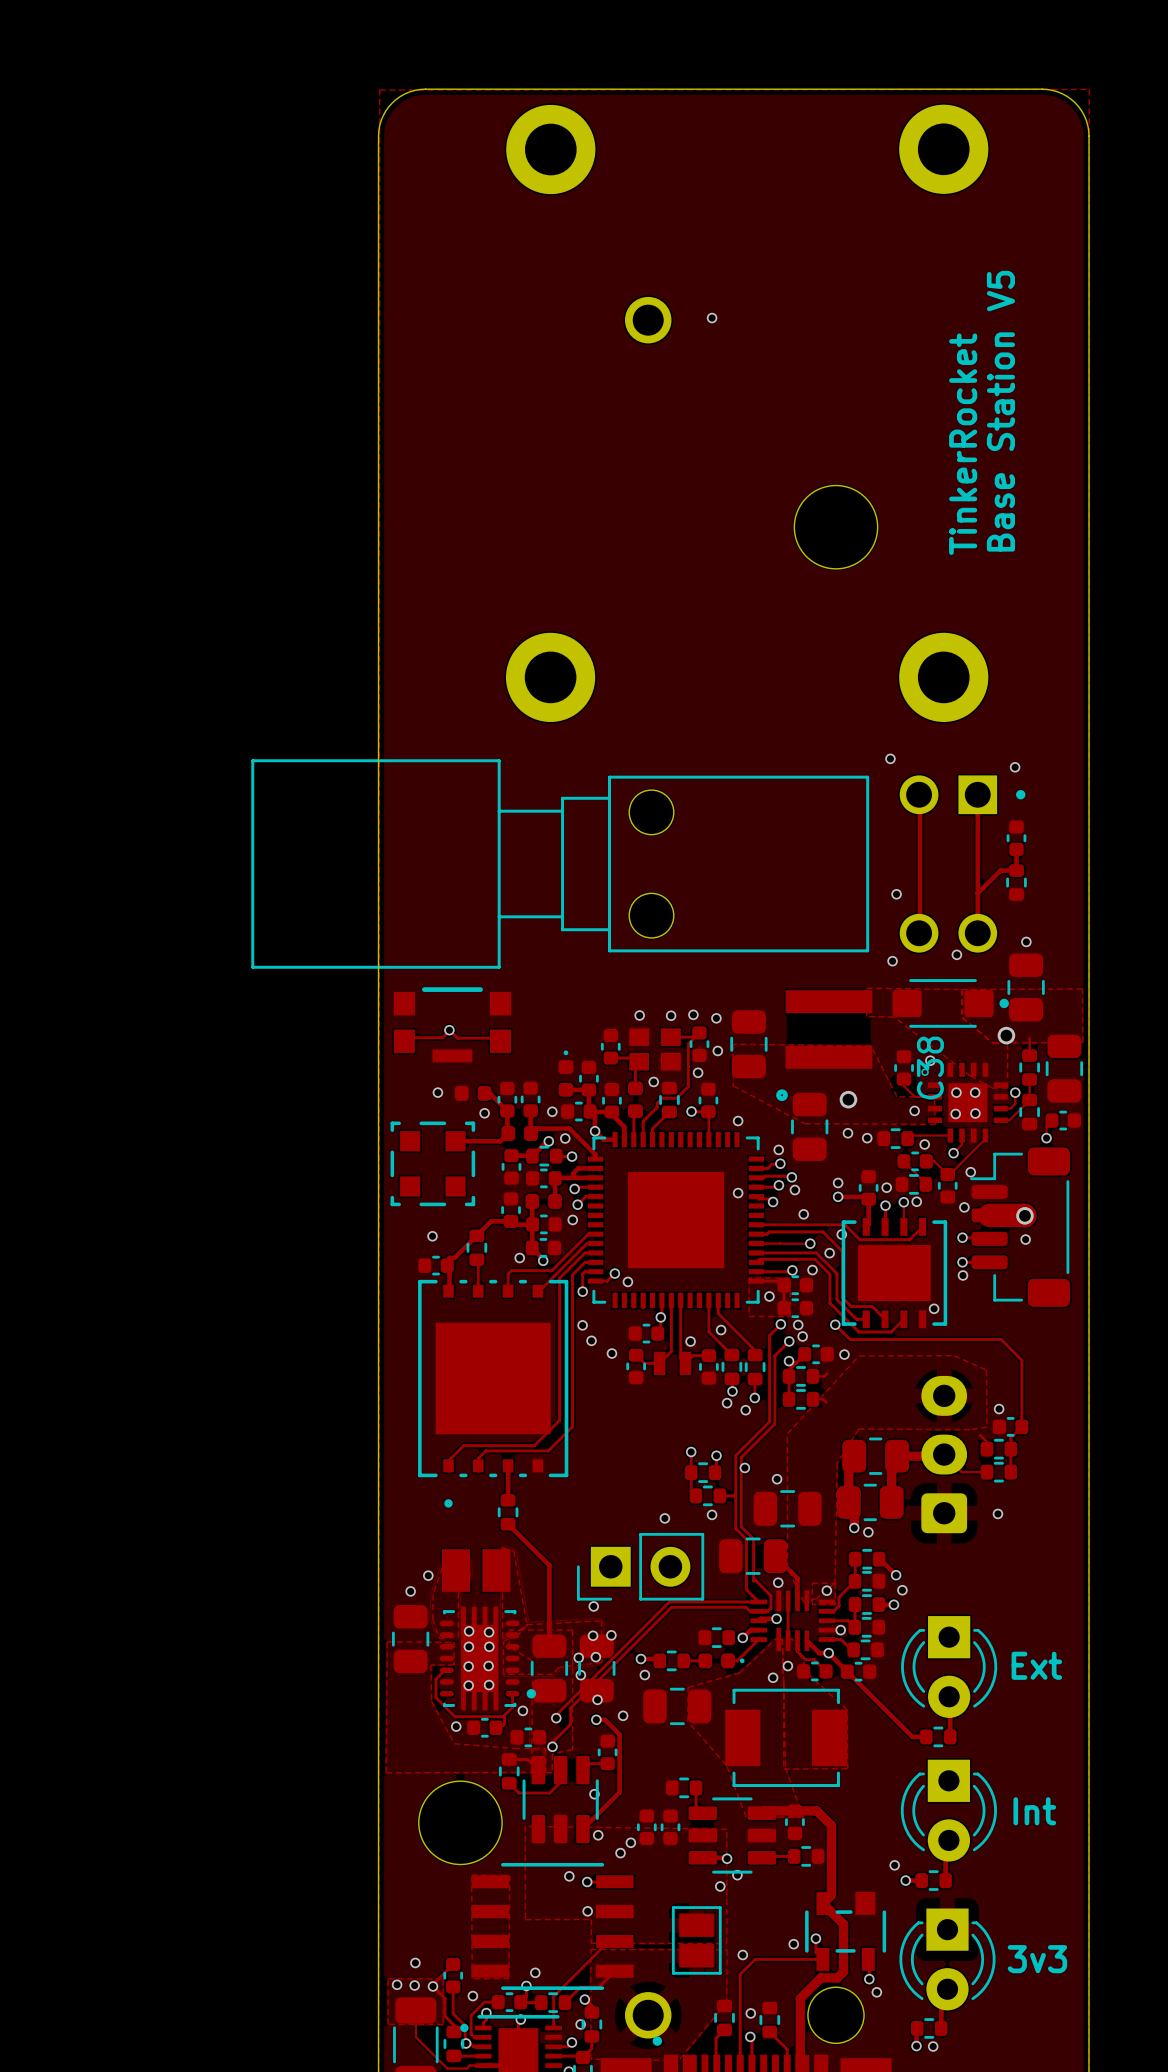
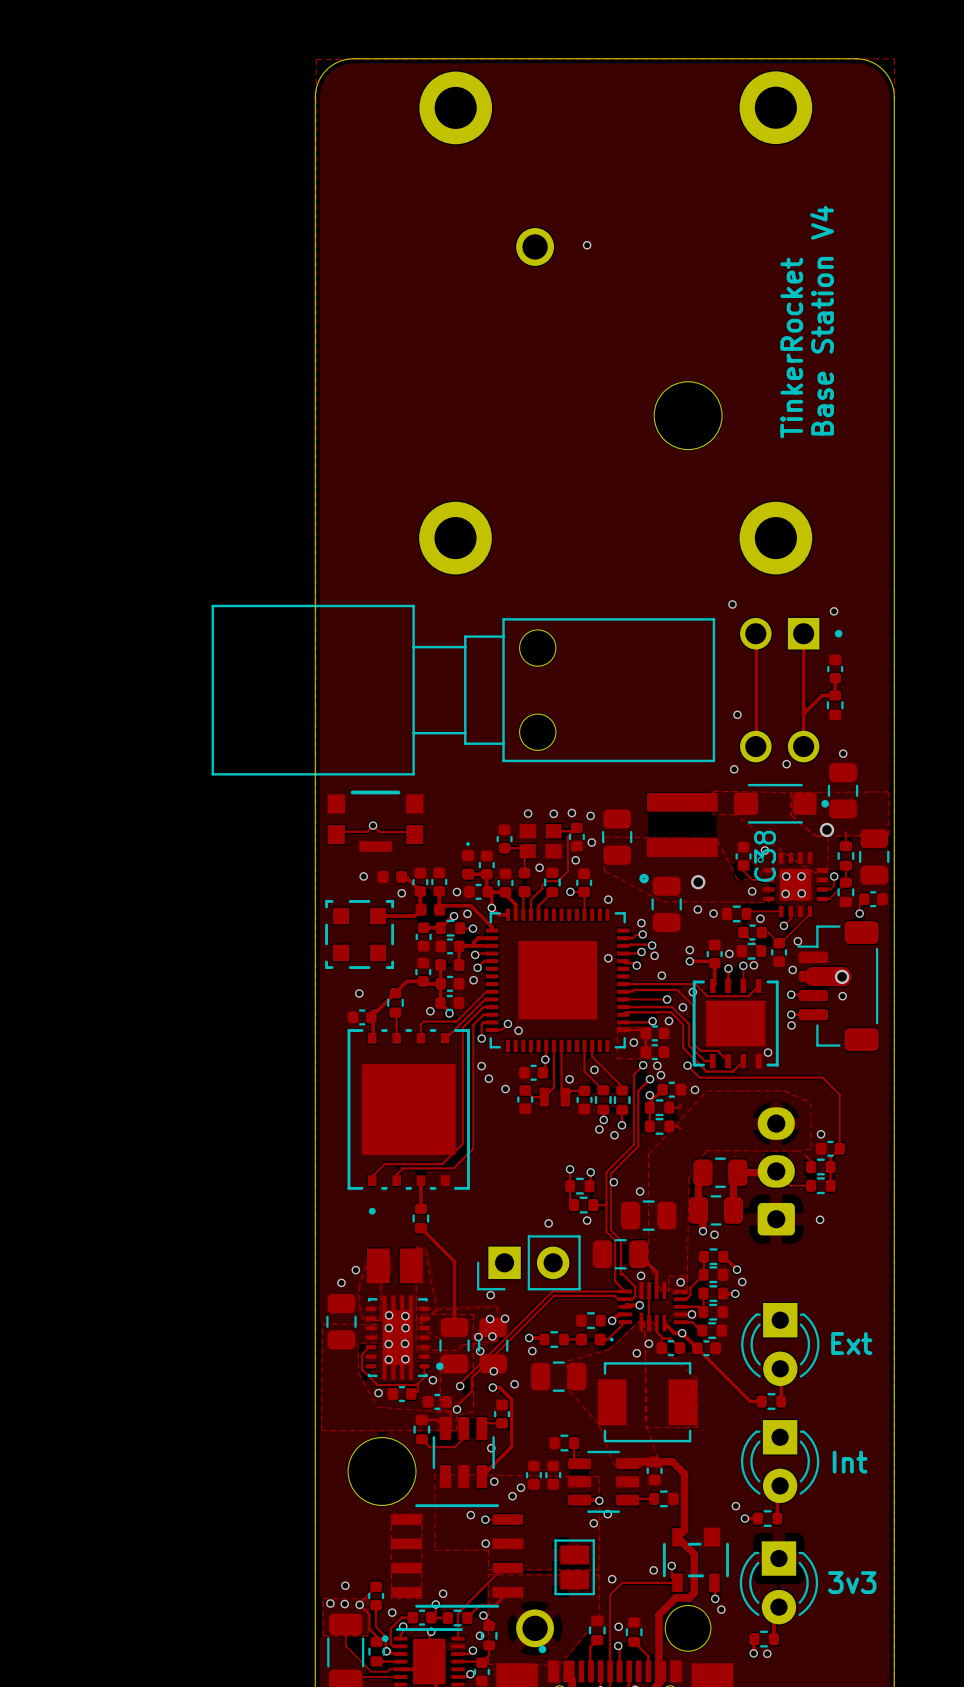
text: Base Station V5 (1000, 411) -> Base Station V4 (822, 320)

